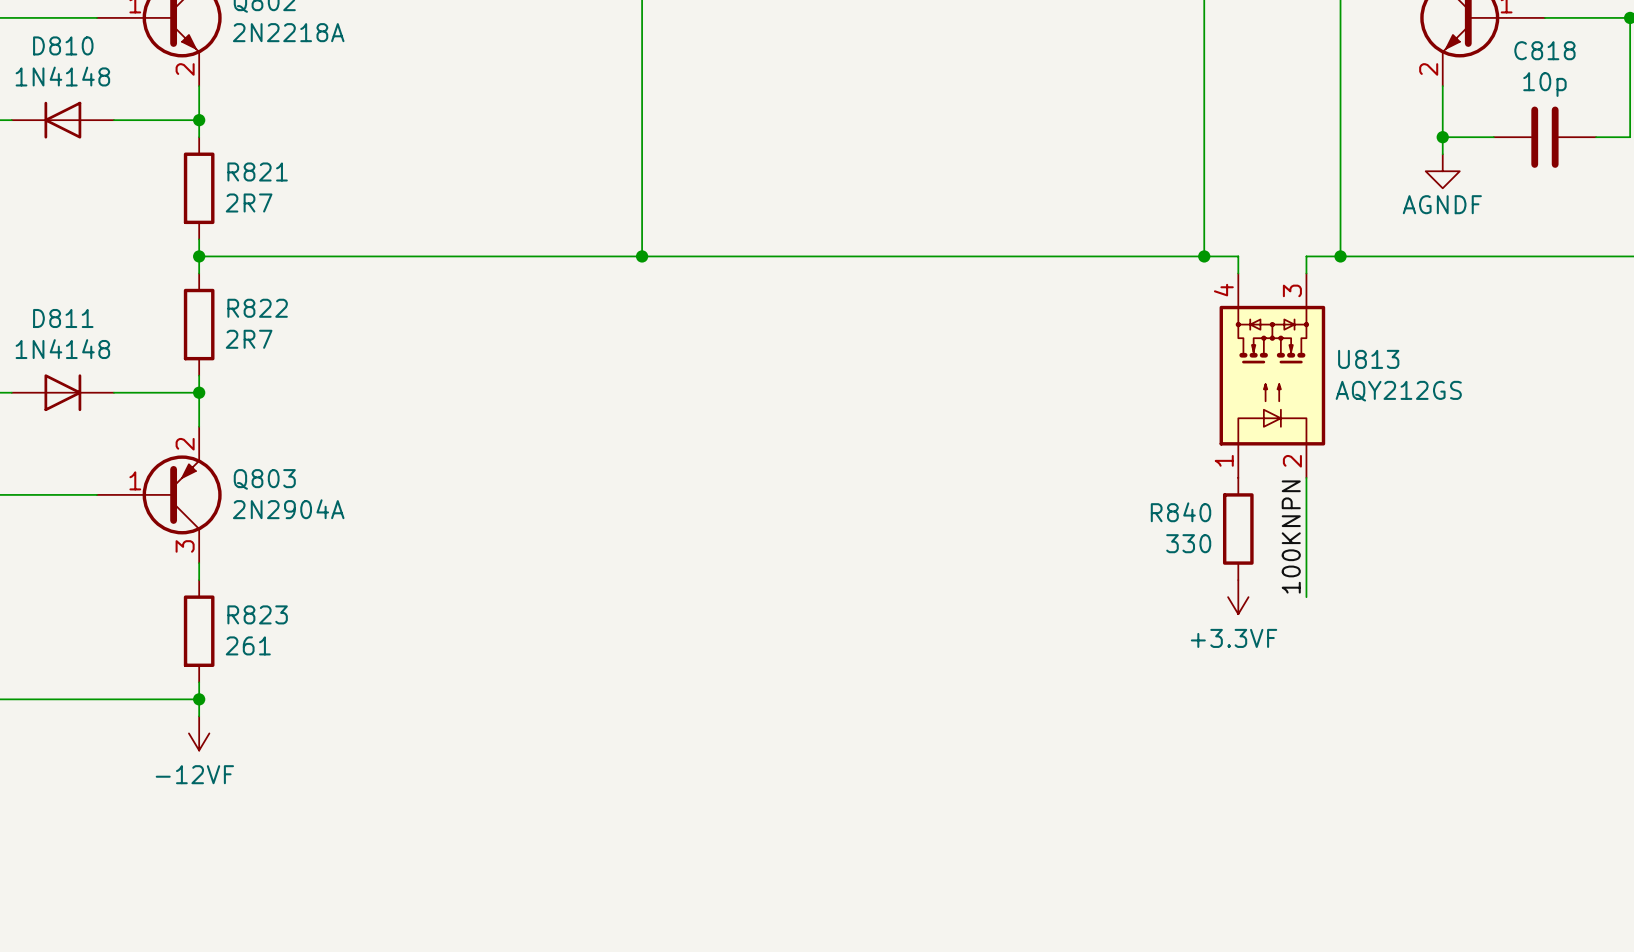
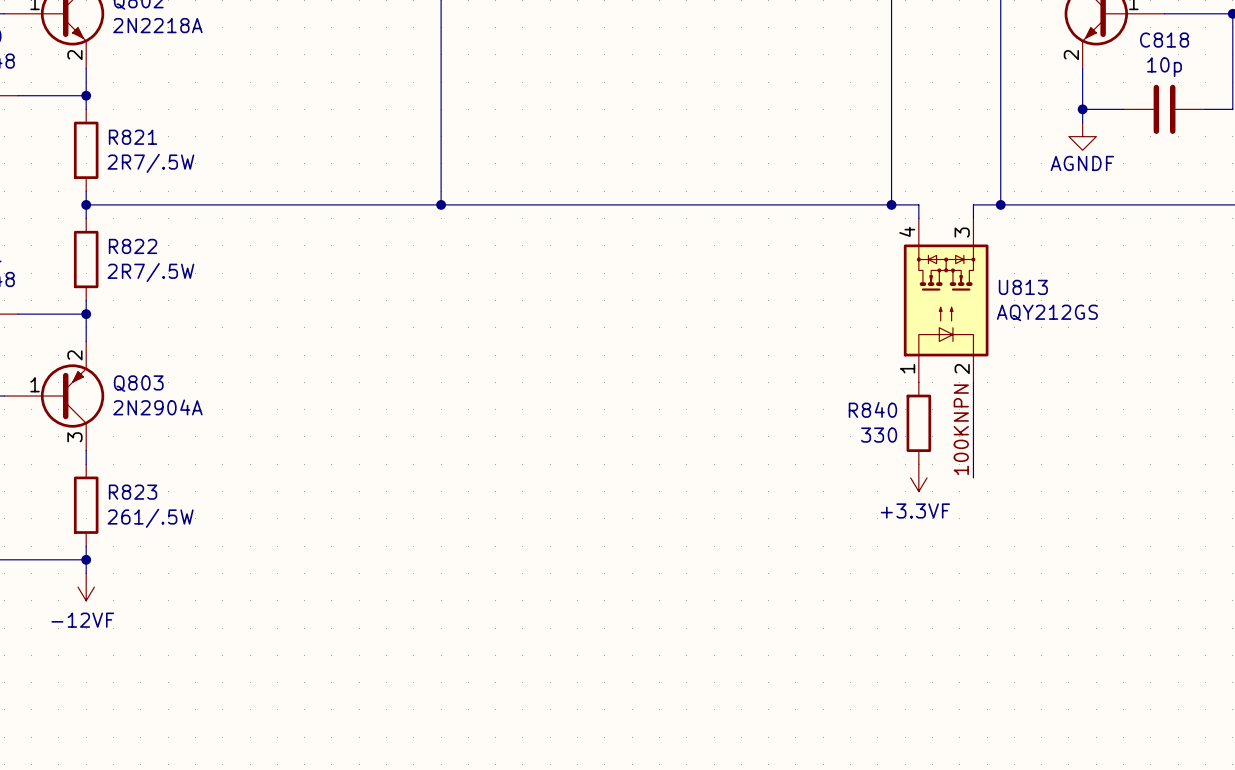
R821 value: 2R7 (249, 202) -> 2R7/.5W (150, 163)
R822 value: 2R7 (249, 339) -> 2R7/.5W (150, 272)
R823 value: 261 (248, 645) -> 261/.5W (150, 518)

